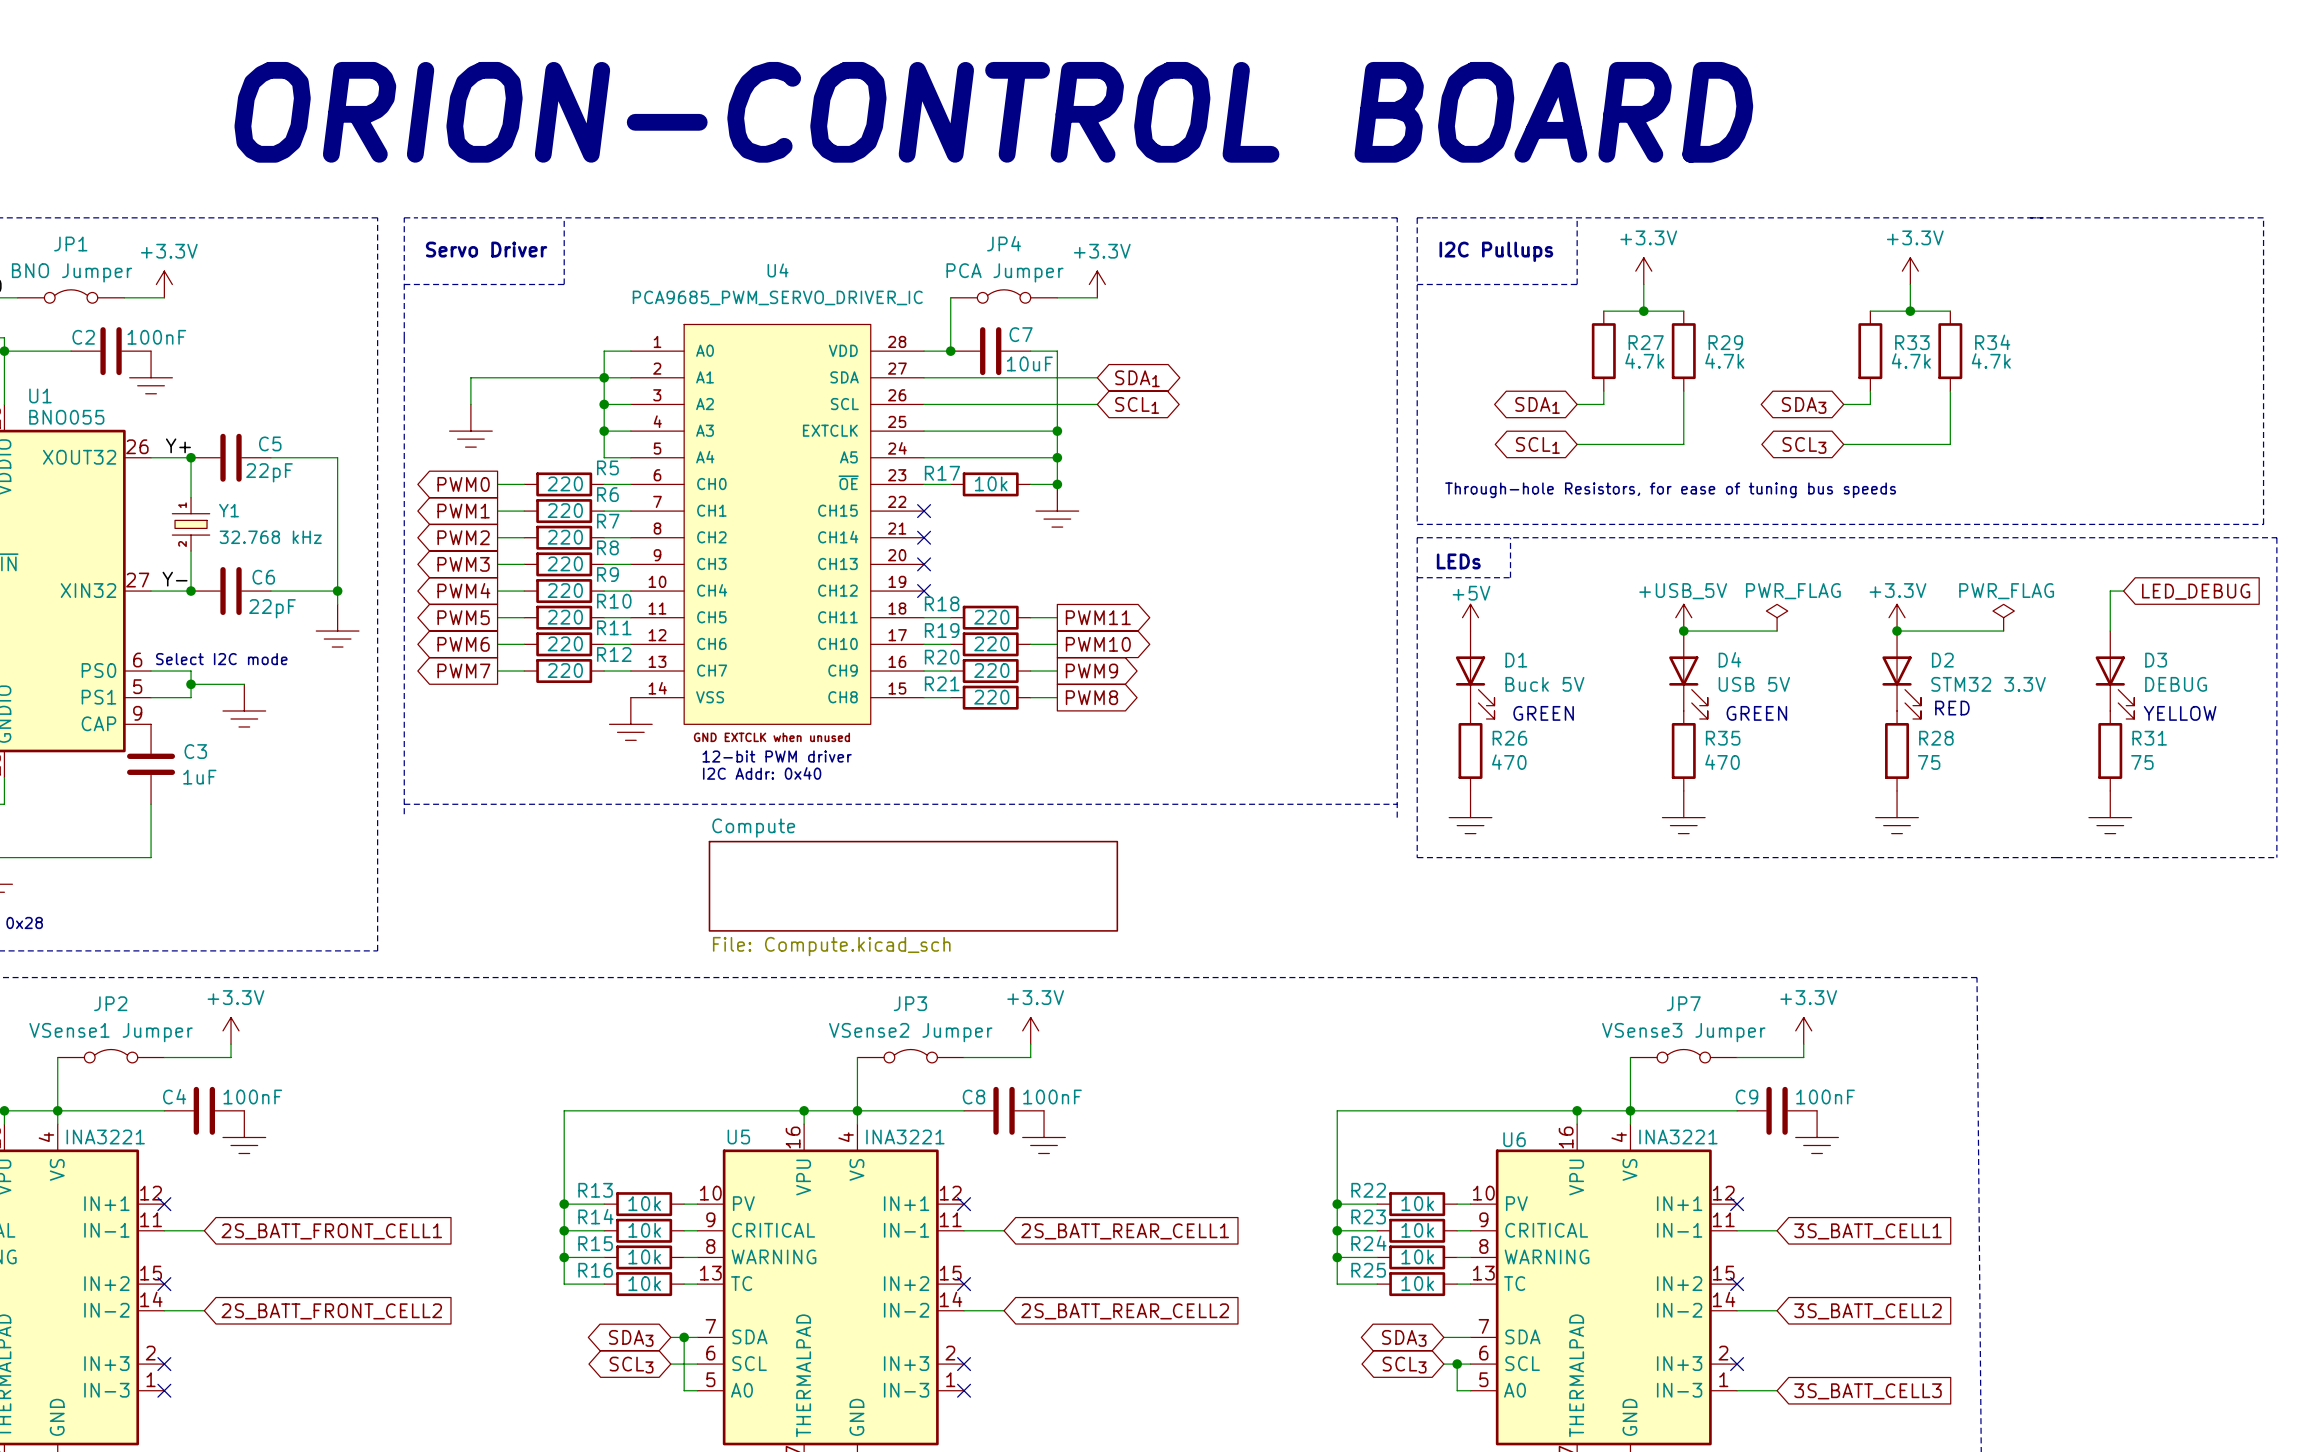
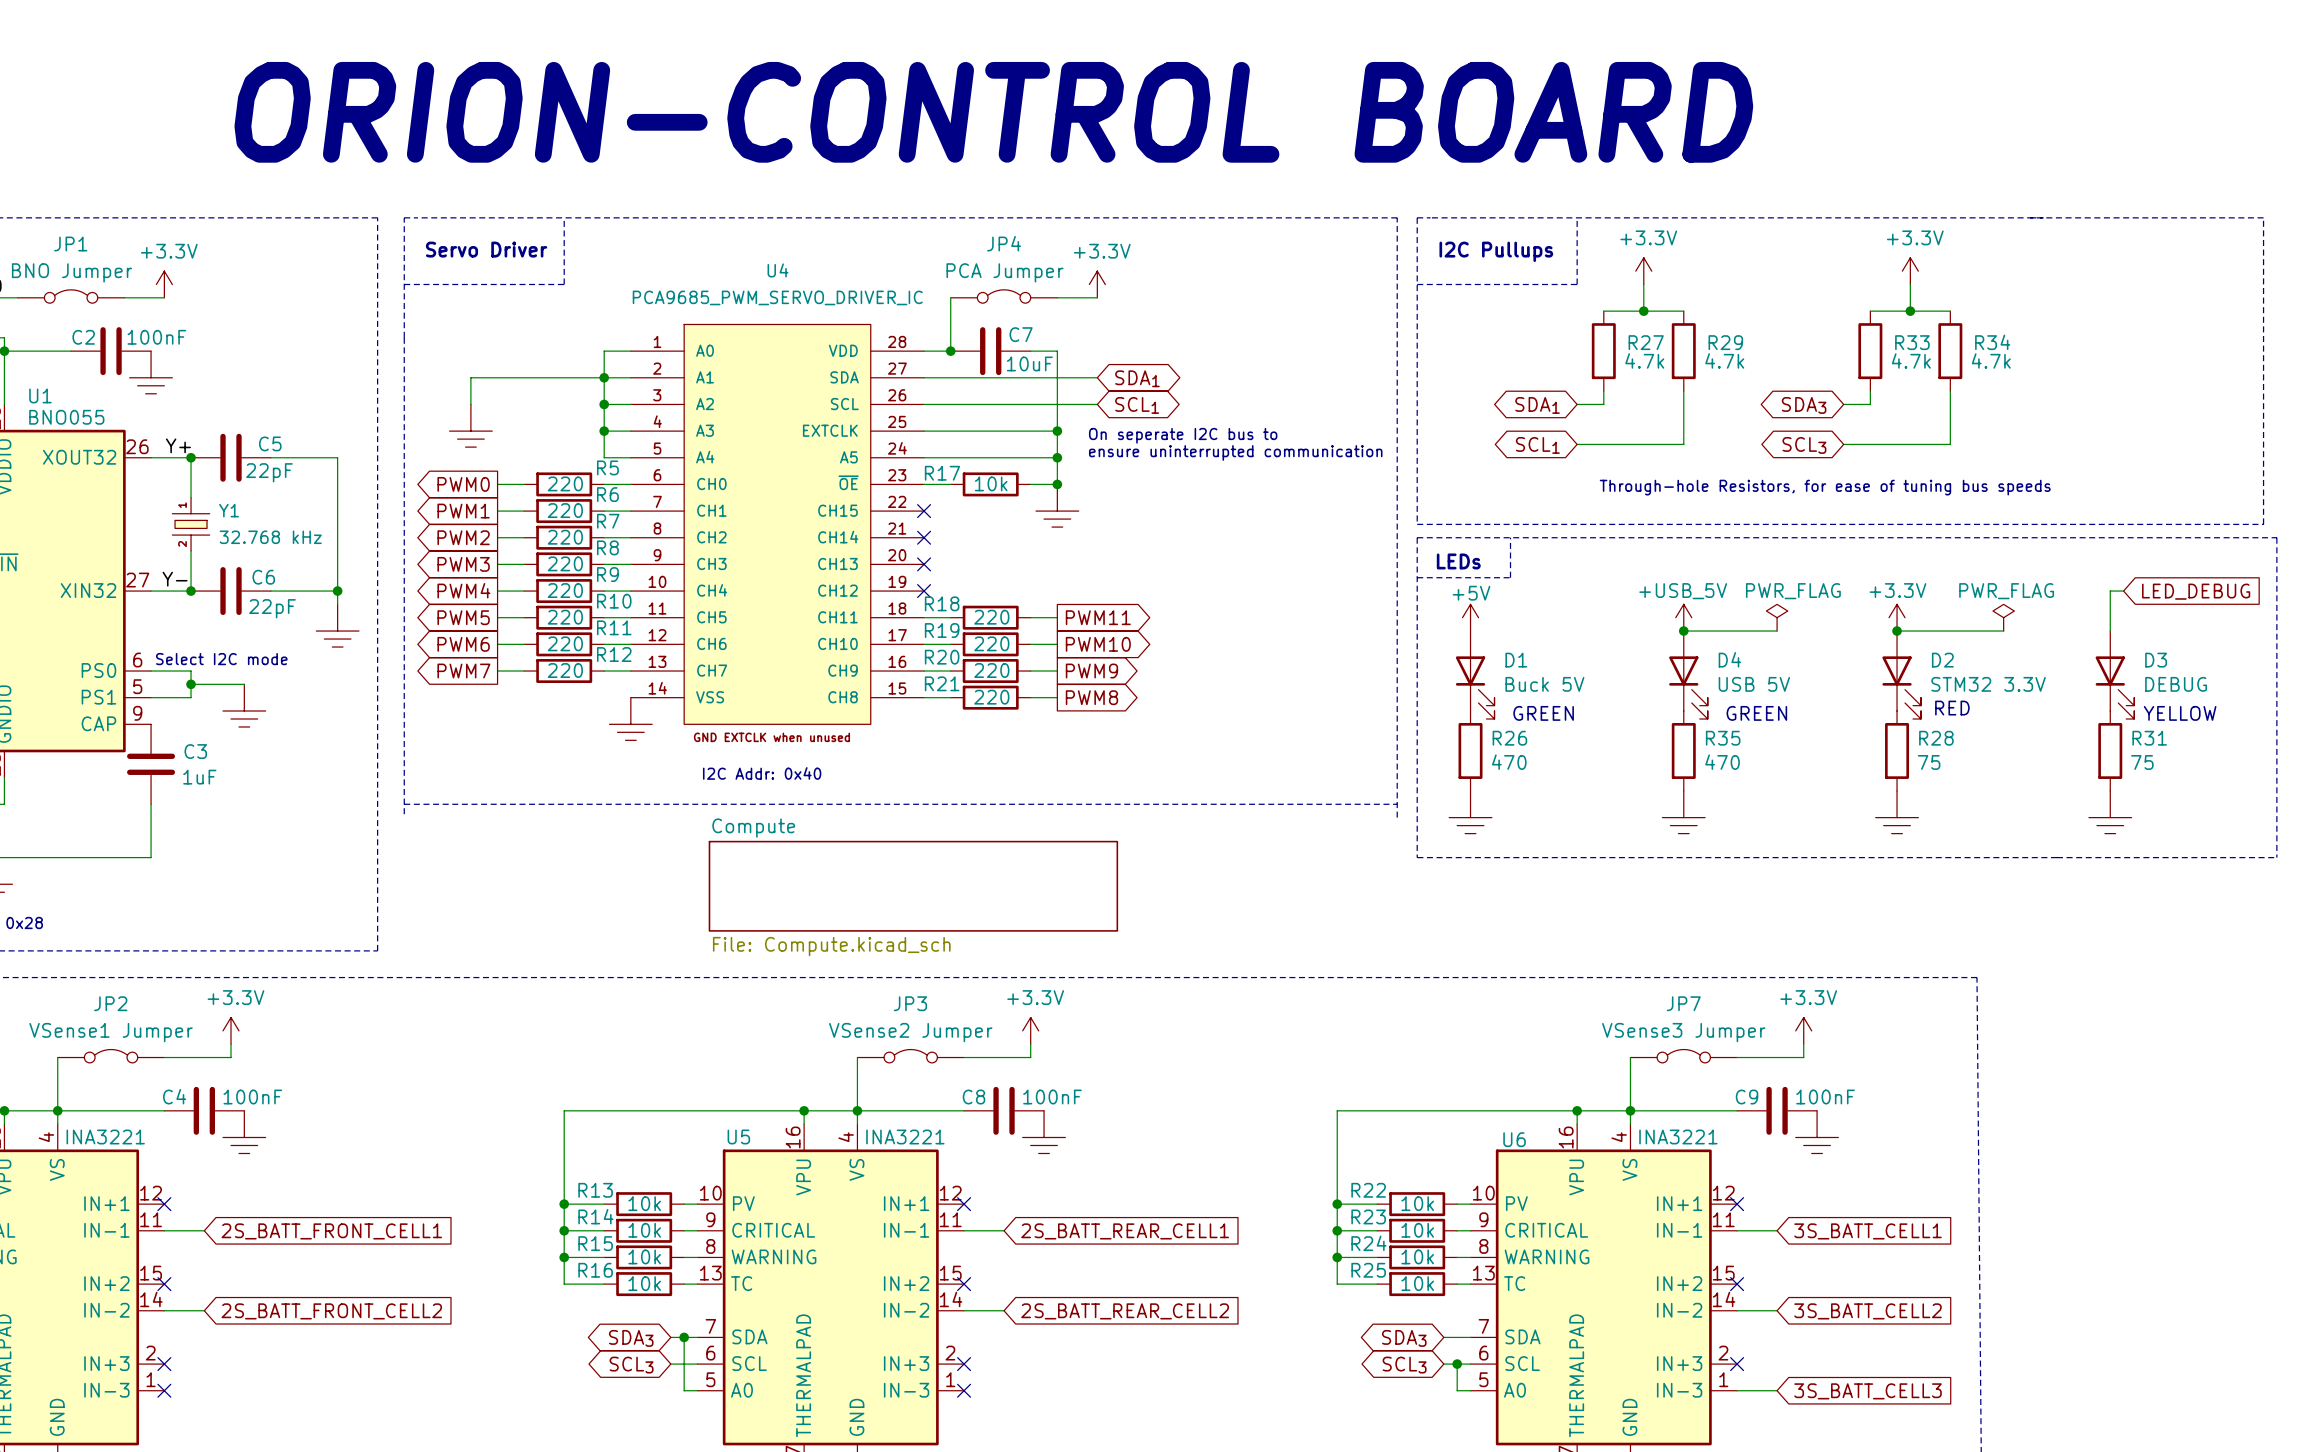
text: none -> On seperate I2C bus to (1183, 435)
text: none -> ensure uninterrupted communication (1235, 452)
text position: Through-hole Resistors, for ease of tuning bus speeds (1670, 490) -> Through-hole Resistors, for ease of tuning bus speeds (1825, 487)
text: 12-bit PWM driver (777, 756) -> none

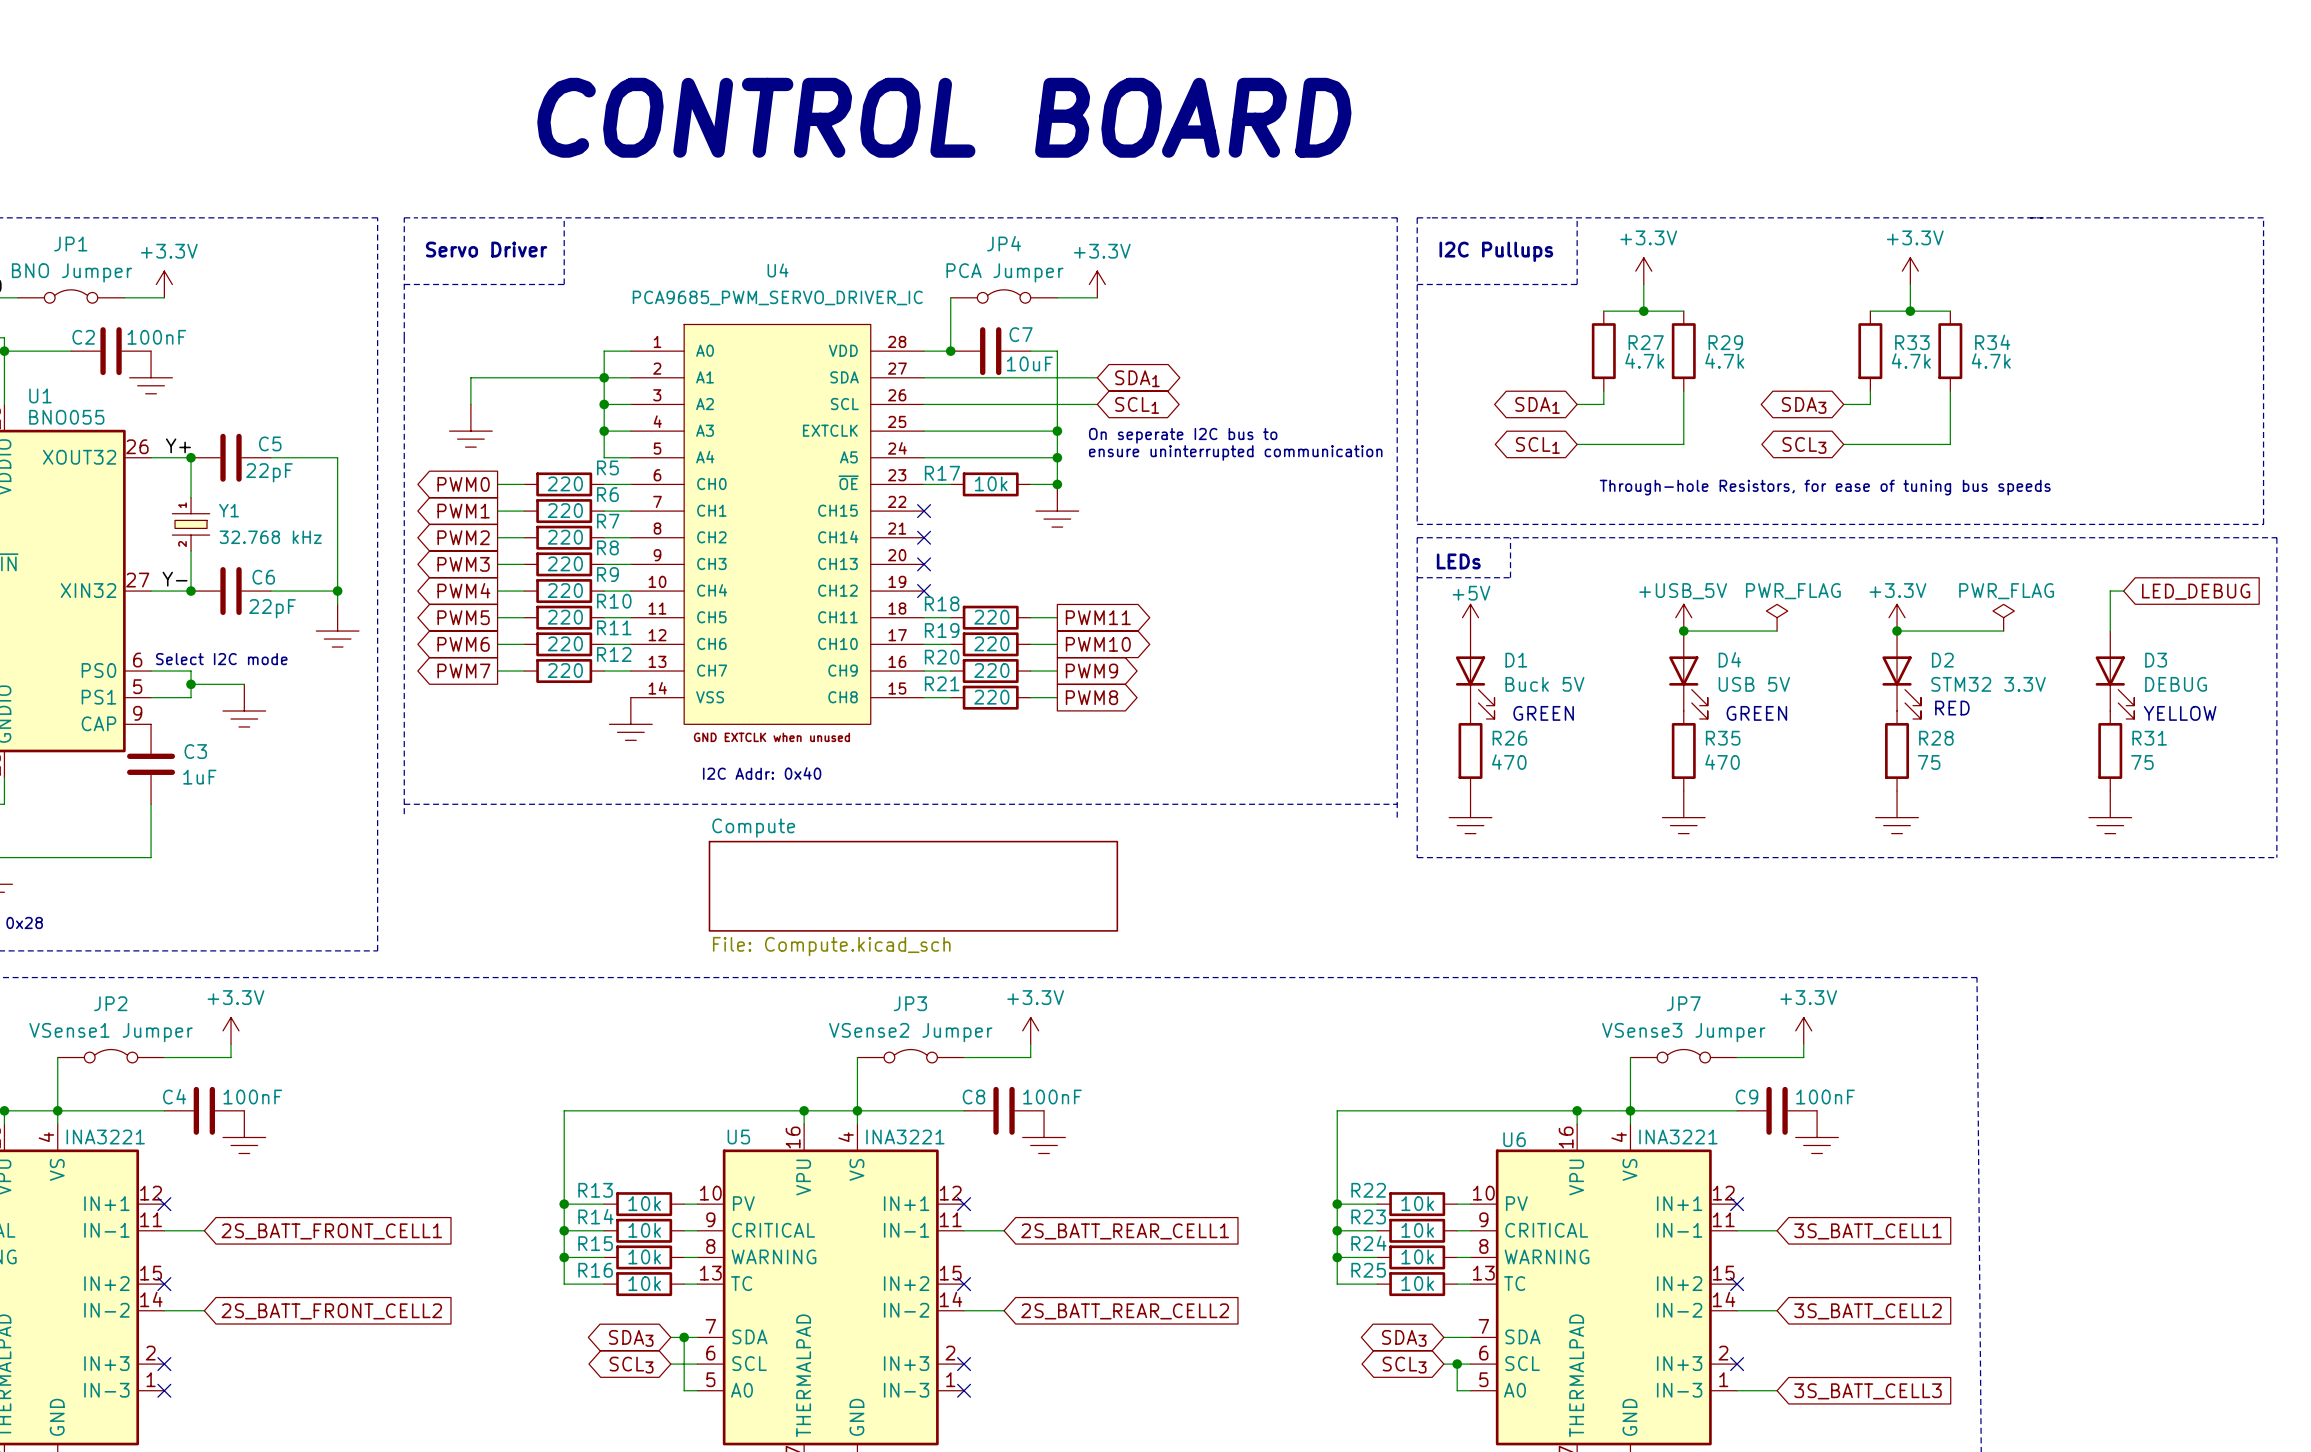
text: ORION-CONTROL BOARD (993, 112) -> none
text: none -> CONTROL BOARD (944, 117)

